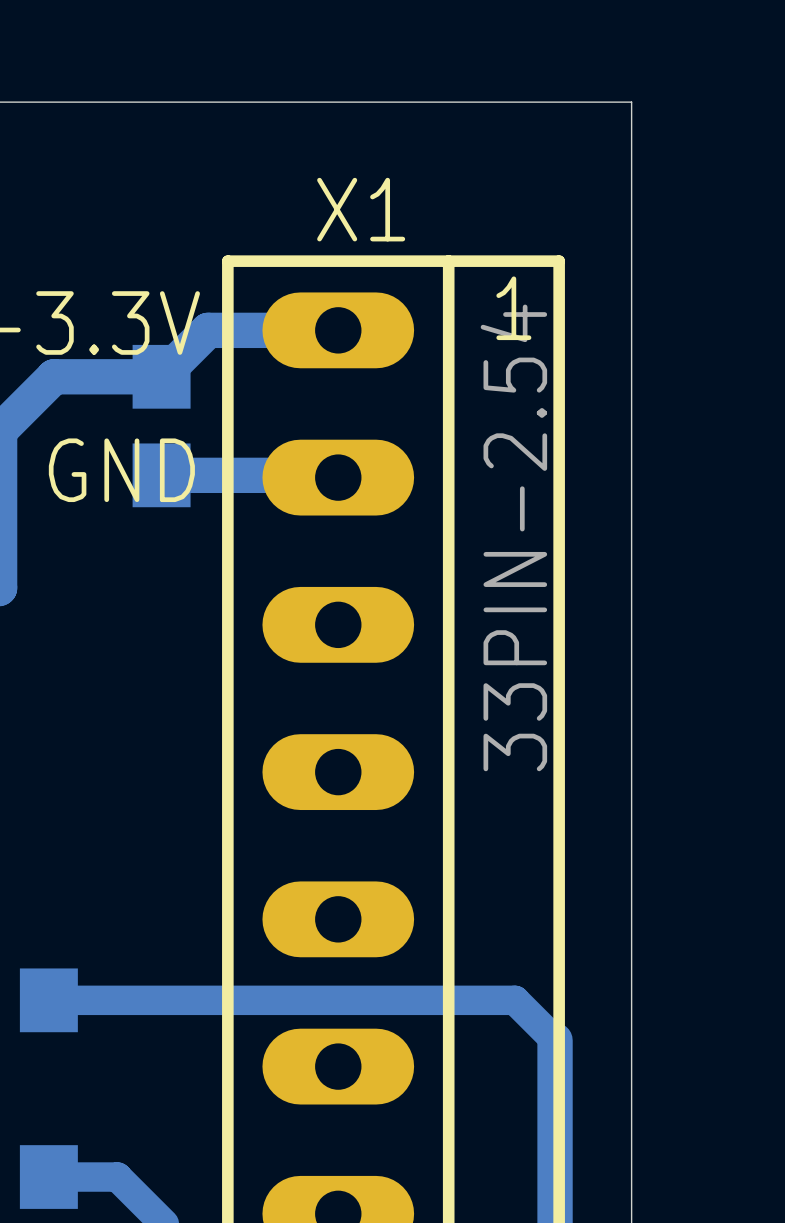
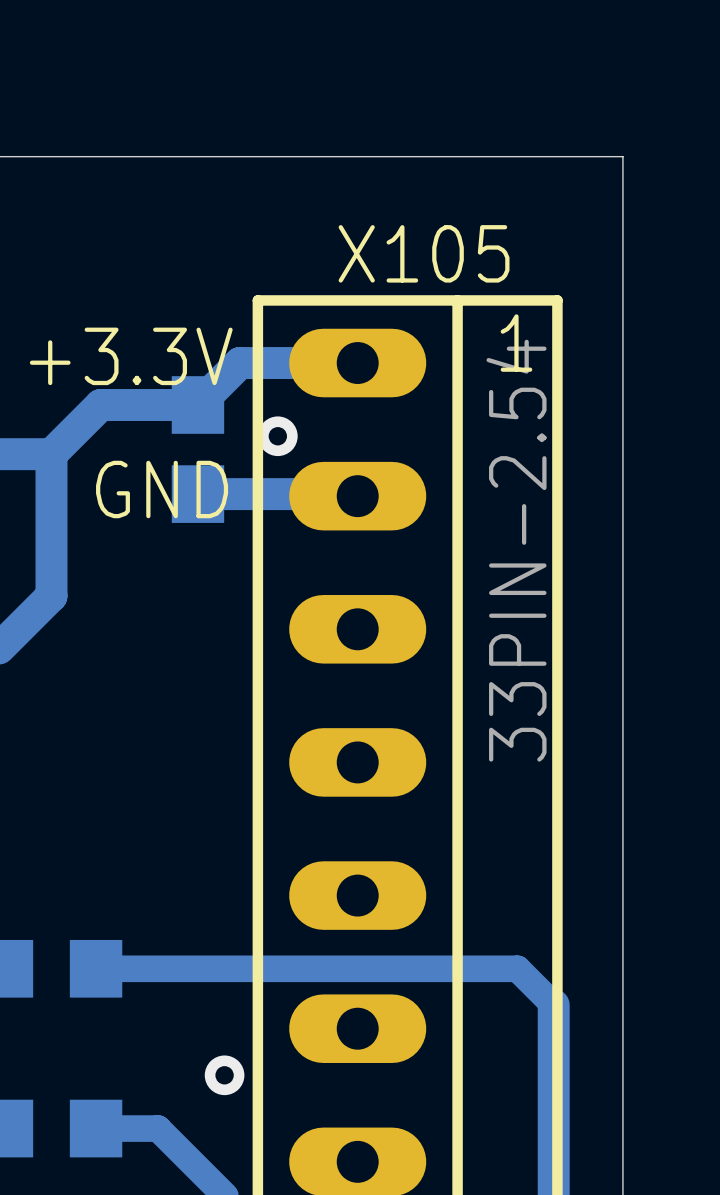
X1 name: X1 (361, 209) -> X105 (424, 253)
via: none -> (277, 436)
via: none -> (224, 1075)

